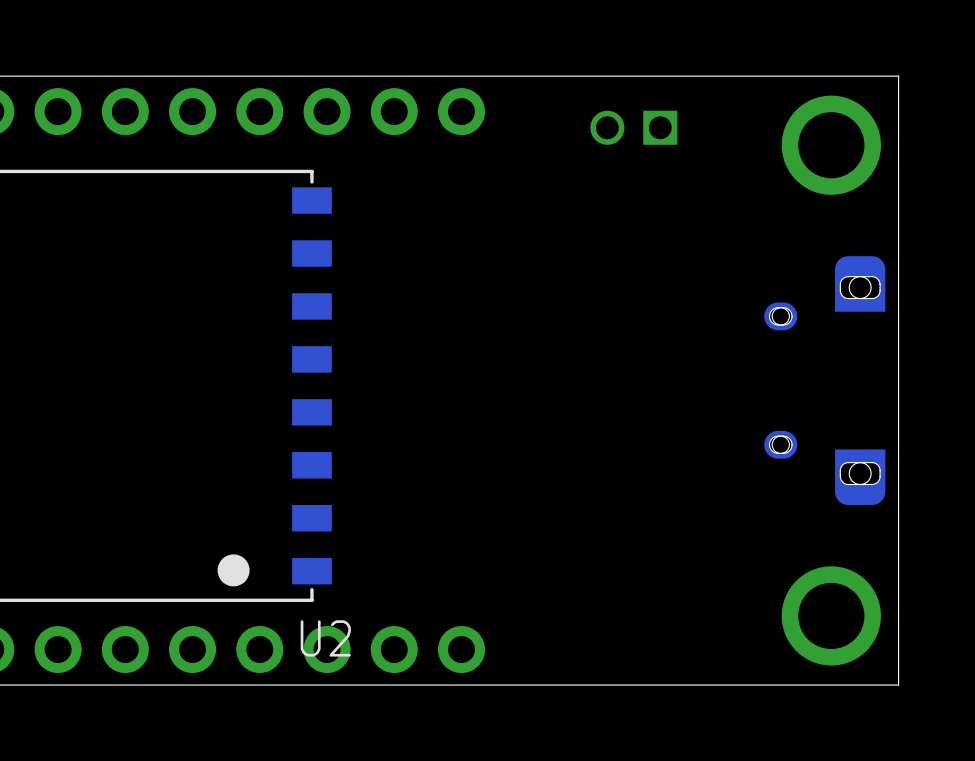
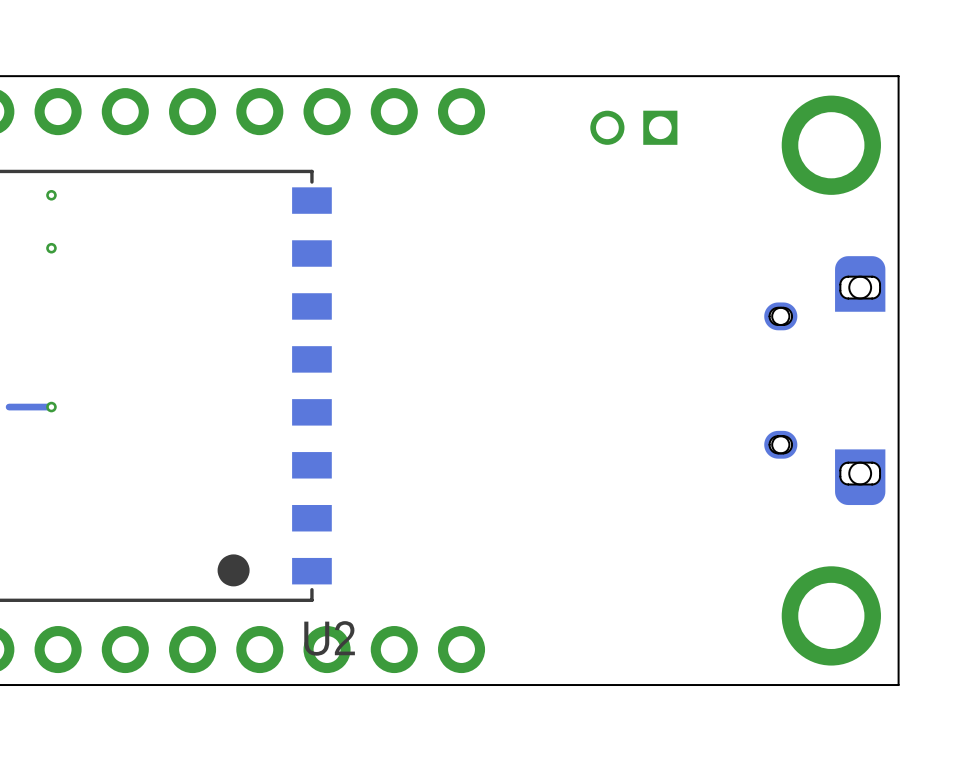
via: none -> (51, 195)
via: none -> (51, 248)
track: none -> (51, 407) (9, 407)
via: none -> (51, 407)

